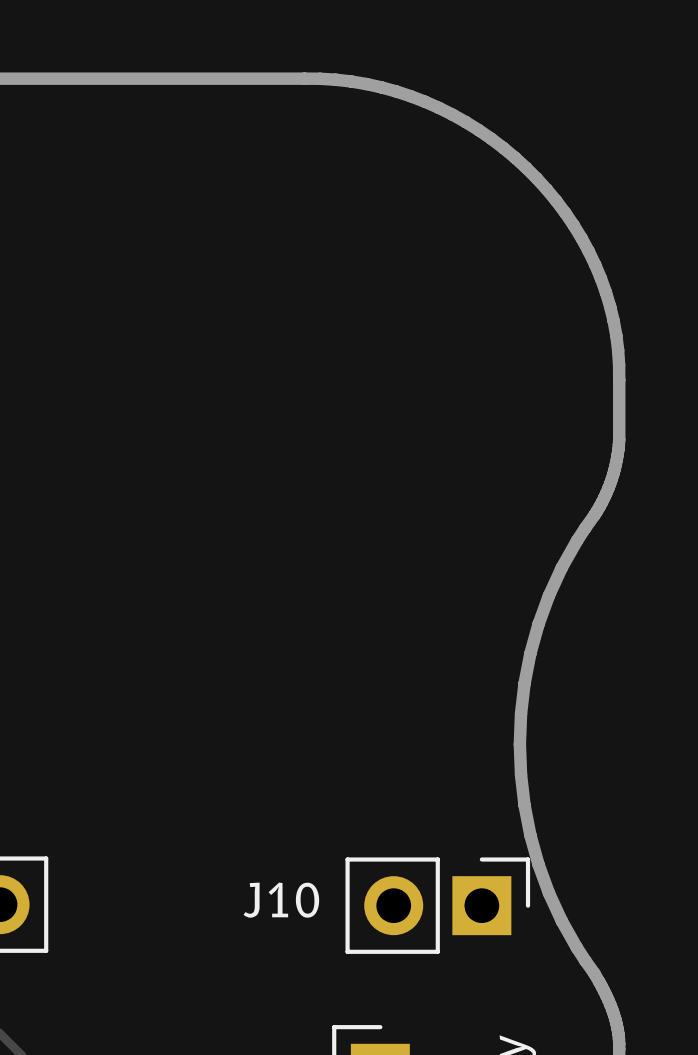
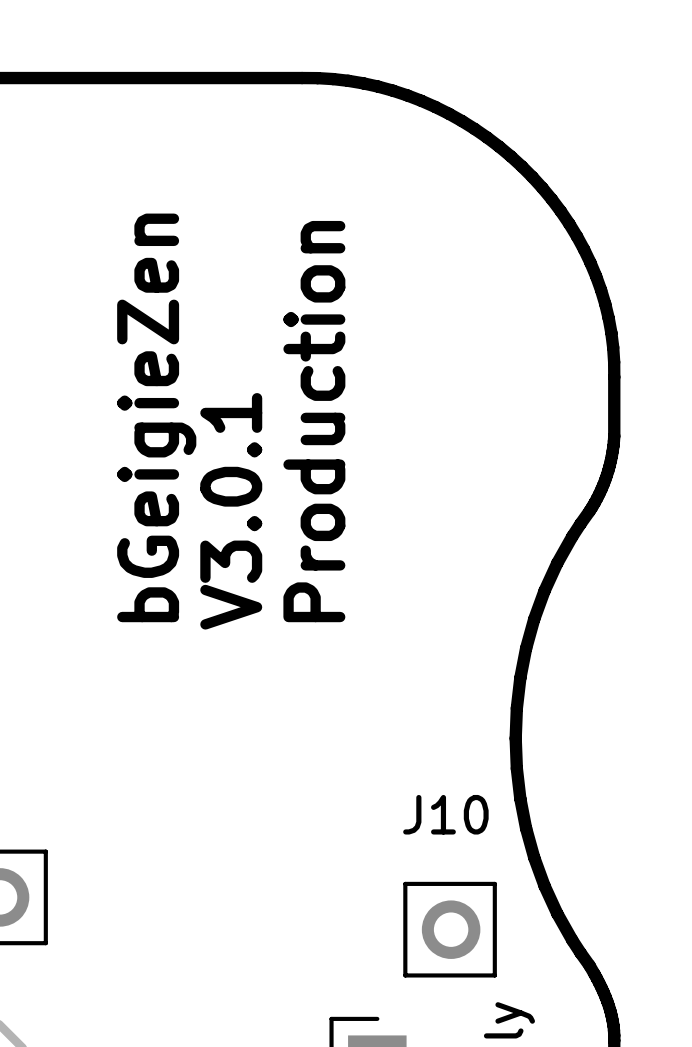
text: none -> bGeigieZen (156, 417)
text: none -> Production (314, 421)
text: none -> V3.0.1 (231, 511)
J10 footprint: [345, 857, 531, 954] -> [403, 881, 497, 978]
J10 name position: J10 (281, 900) -> J10 (445, 814)

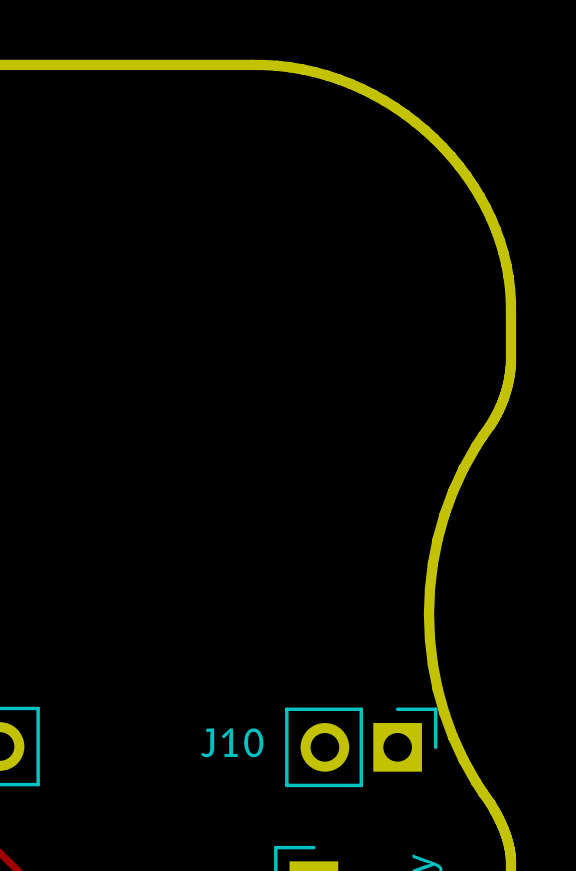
text: bGeigieZen (156, 417) -> none
text: Production (314, 421) -> none
text: V3.0.1 (231, 511) -> none
J10 name position: J10 (445, 814) -> J10 (232, 742)
J10 footprint: [403, 881, 497, 978] -> [285, 707, 438, 788]

